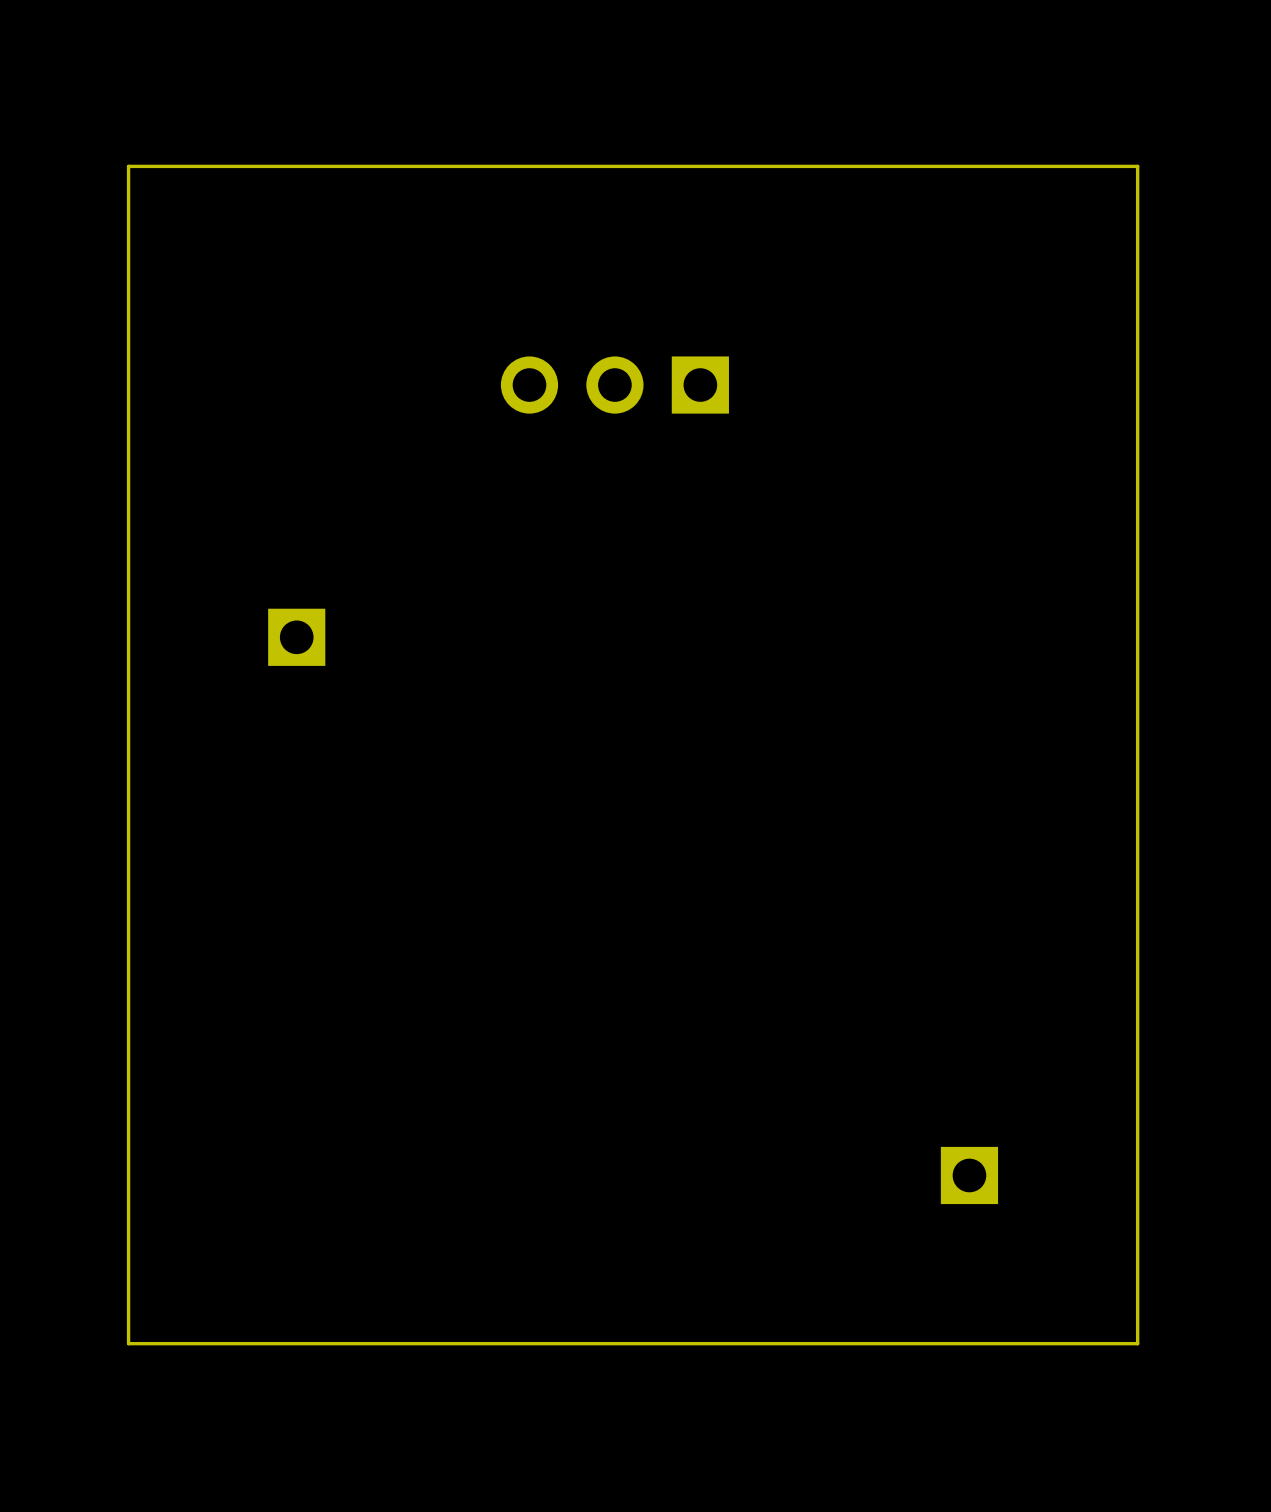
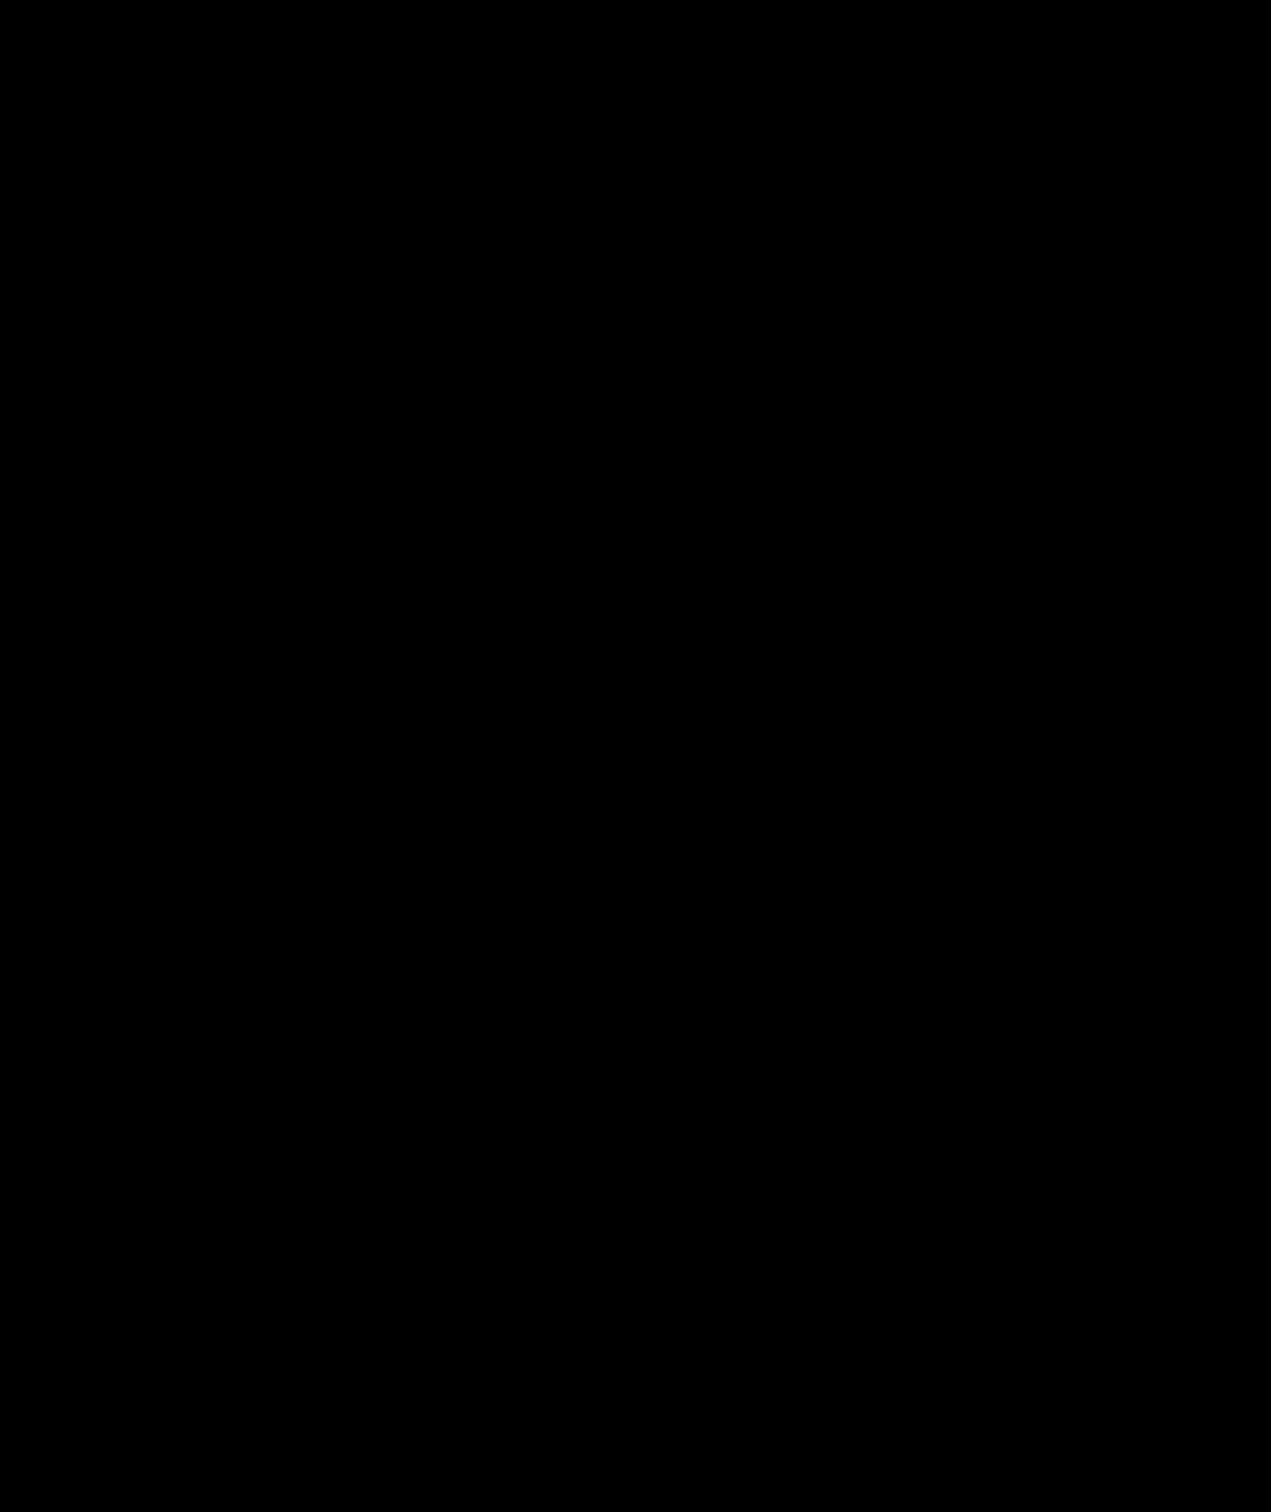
board edge: (1137, 166) (128, 166) (128, 1343) (1137, 1343) (1137, 166) -> none
part: (614, 385) -> none
part: (296, 637) -> none
part: (969, 1175) -> none

